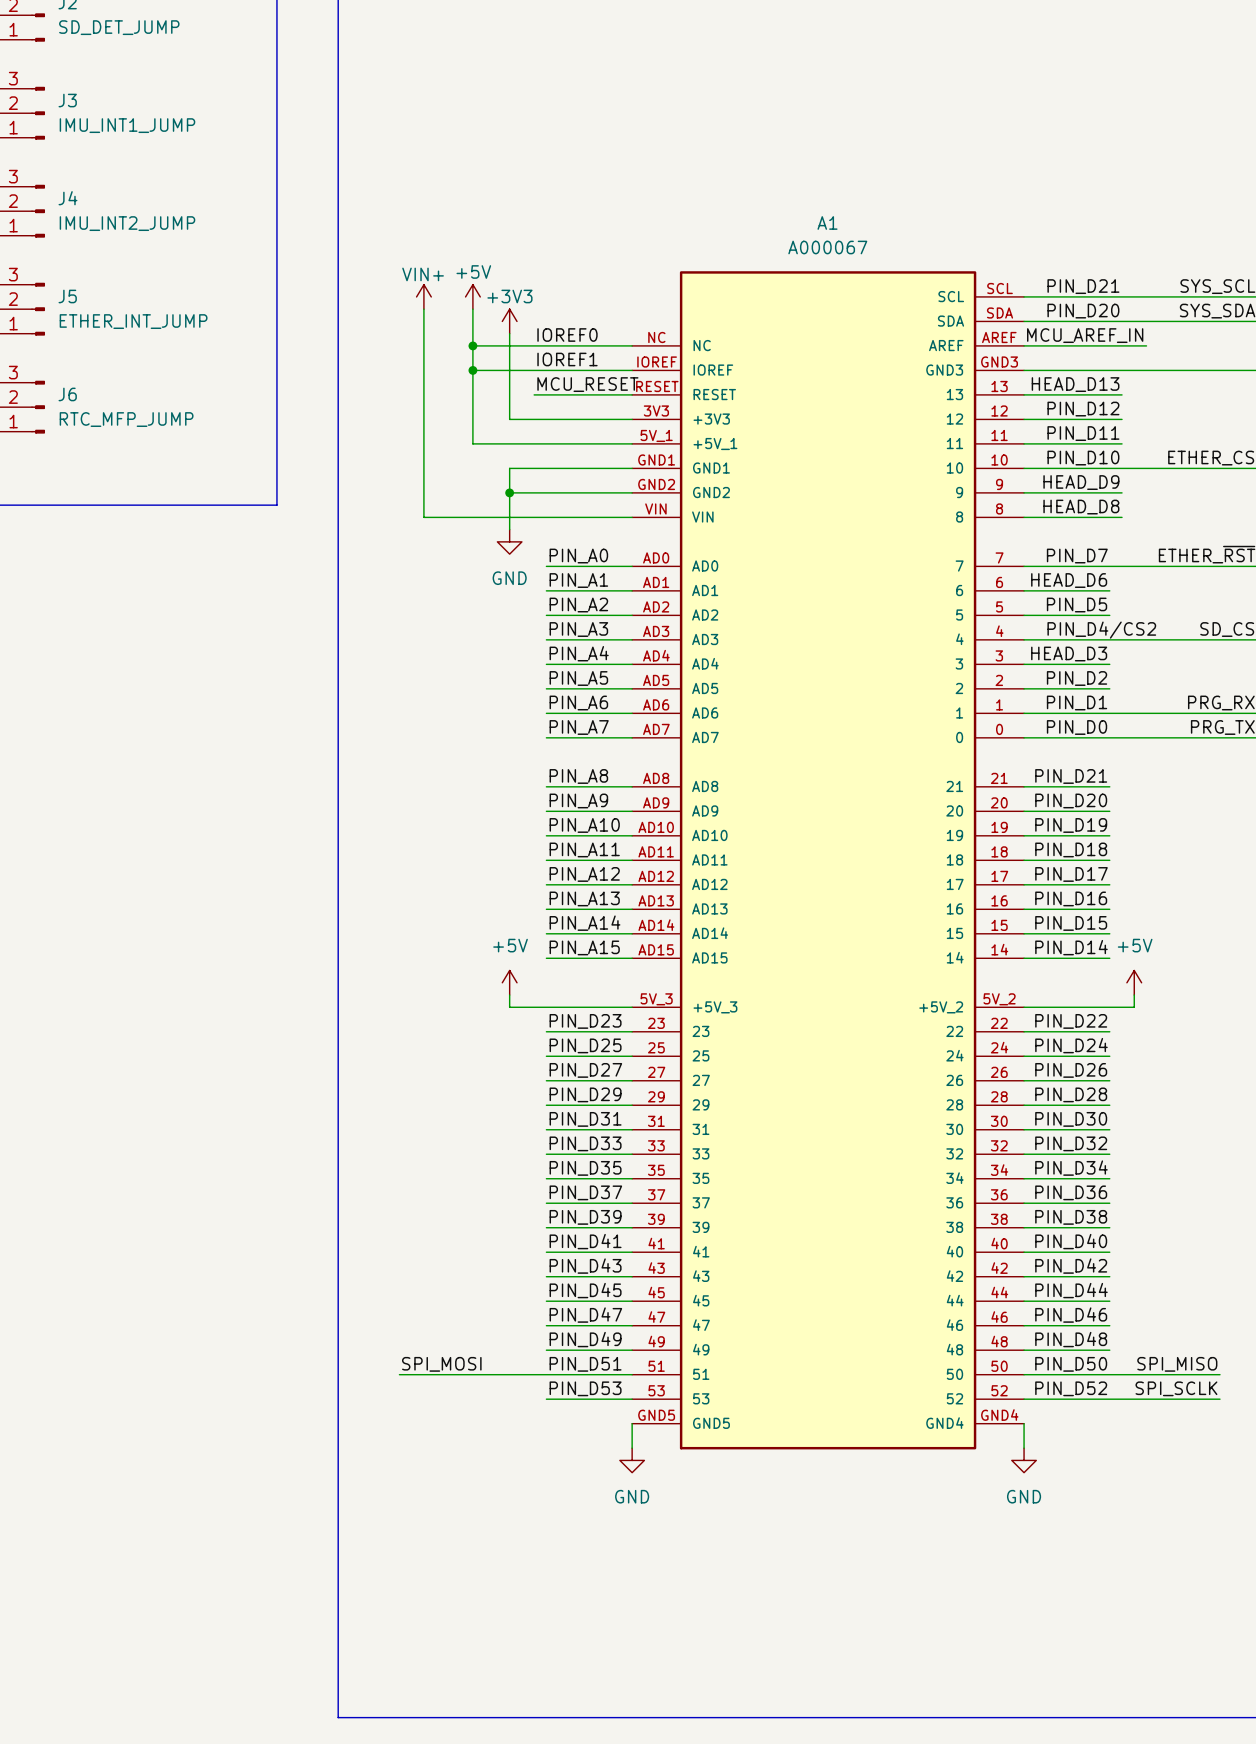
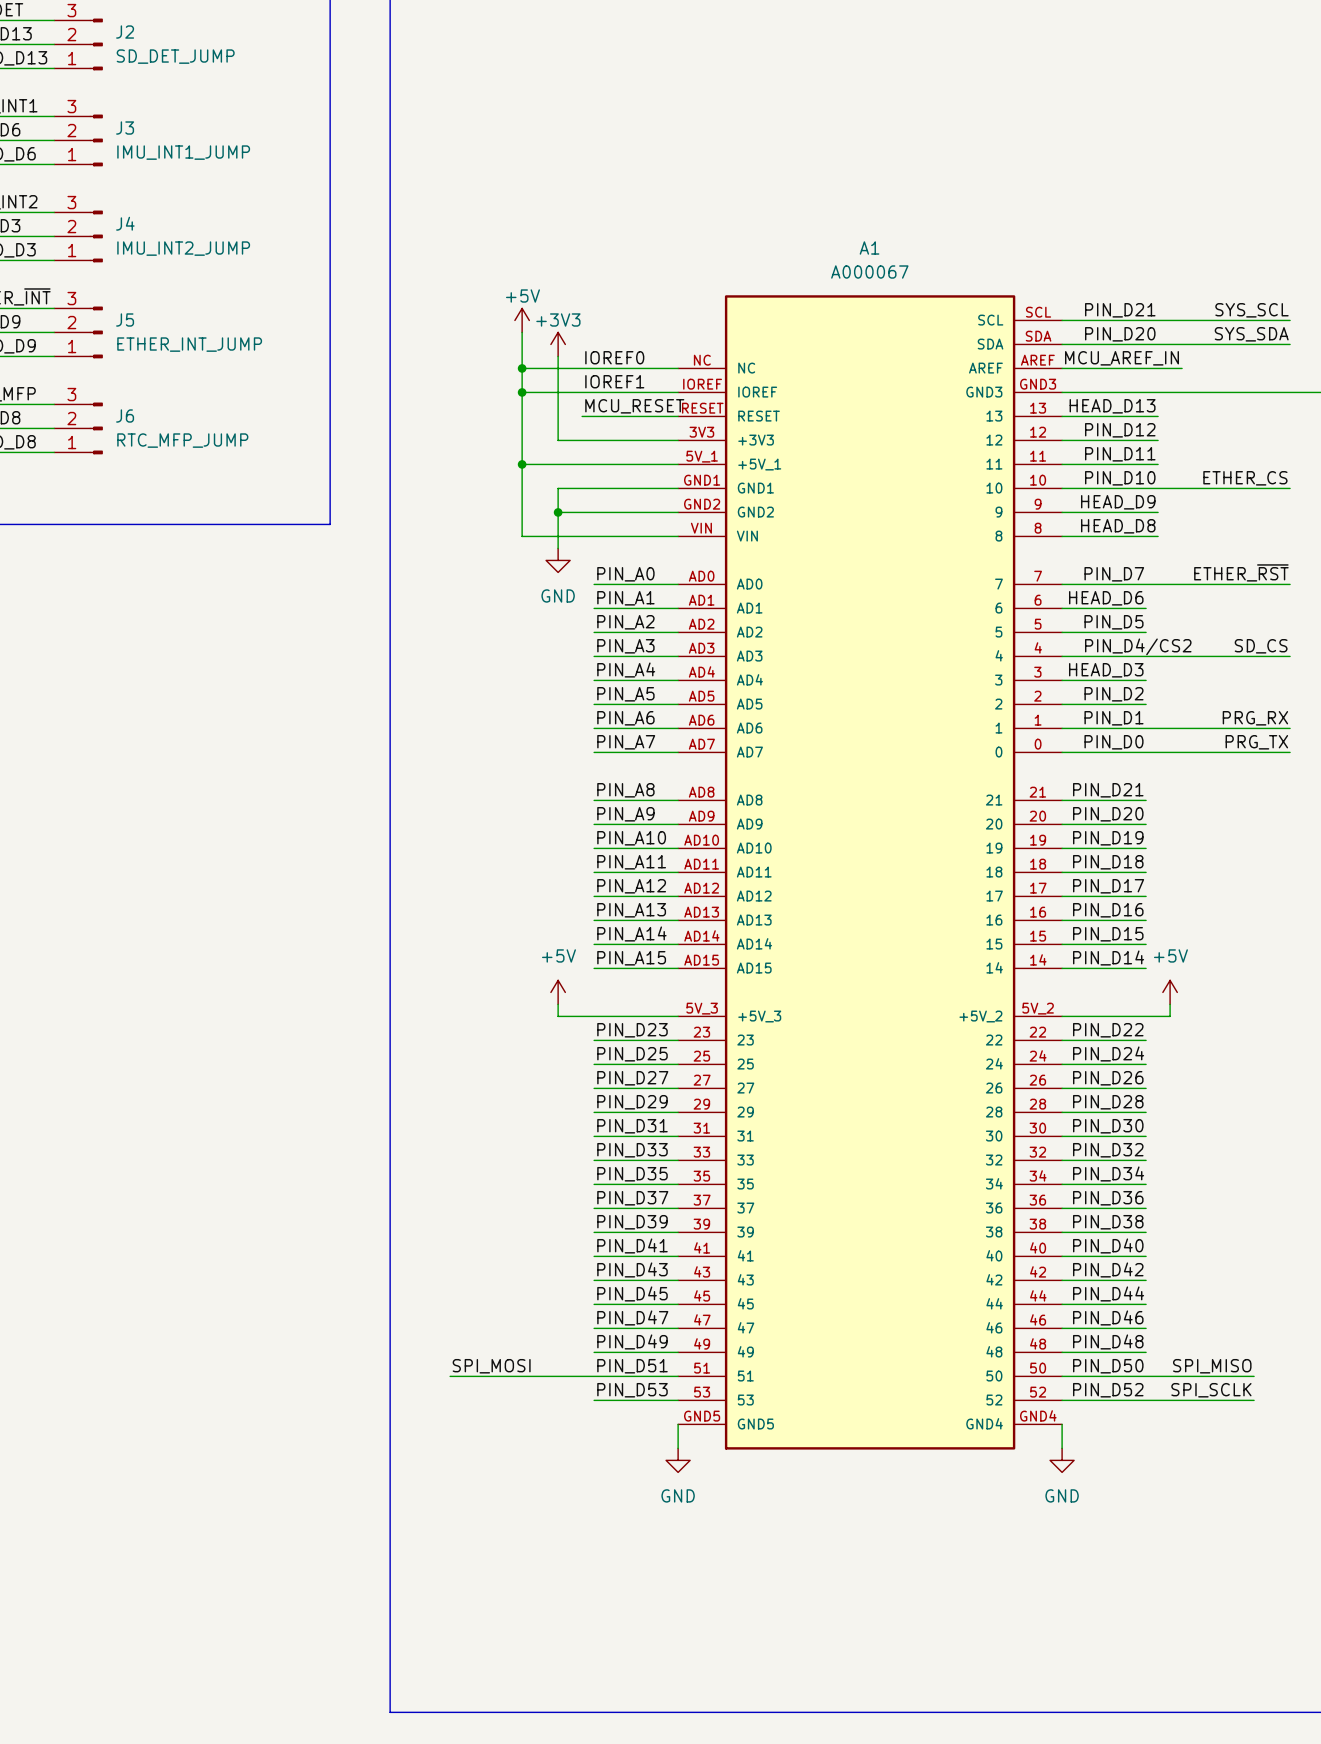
power symbol: VIN+ (423, 296) -> none
wire: (423, 309) (423, 517) (472, 517) -> (522, 464) (522, 536)
junction: none -> (522, 464)

